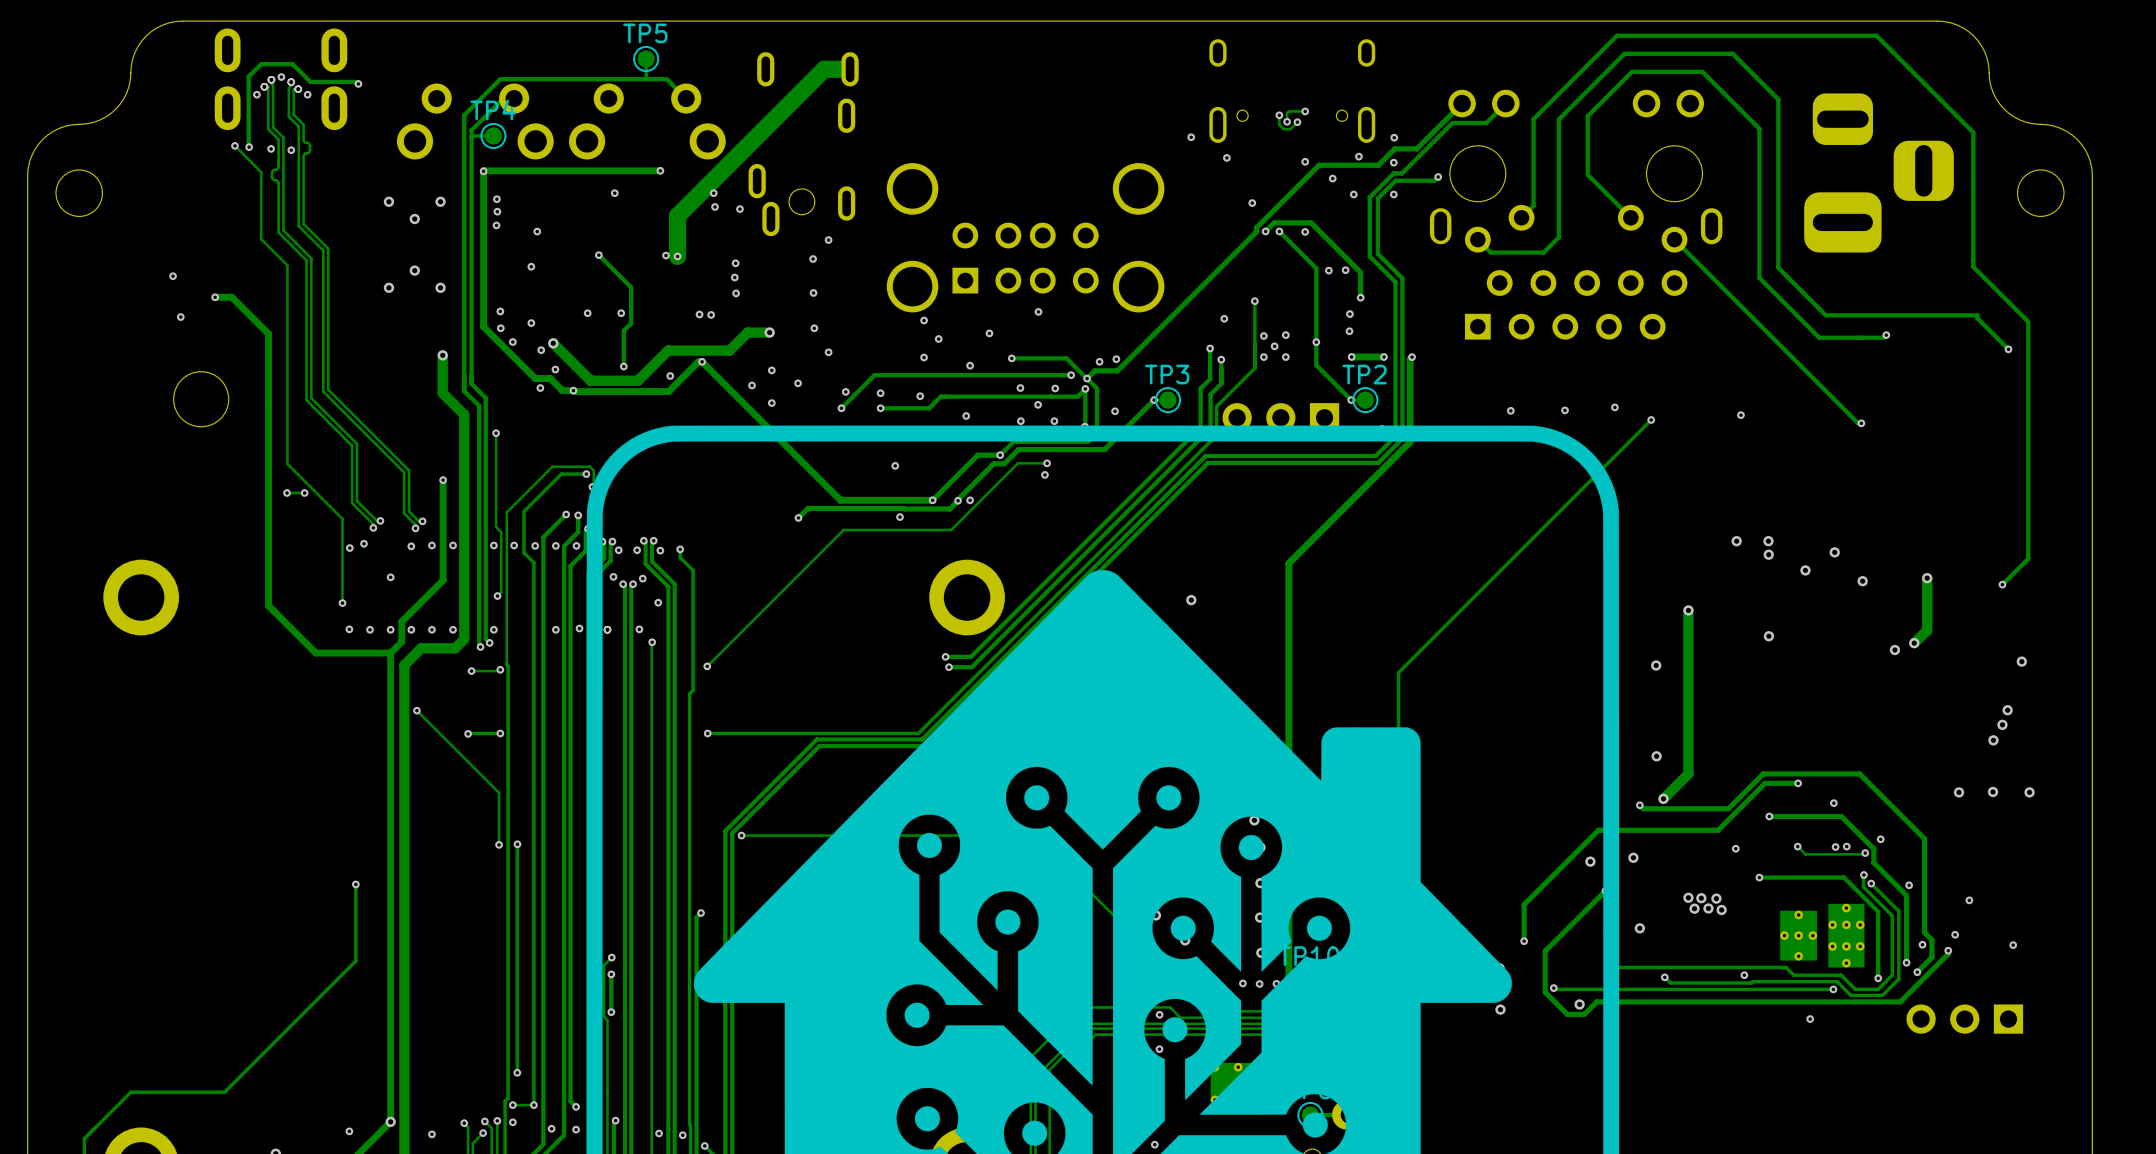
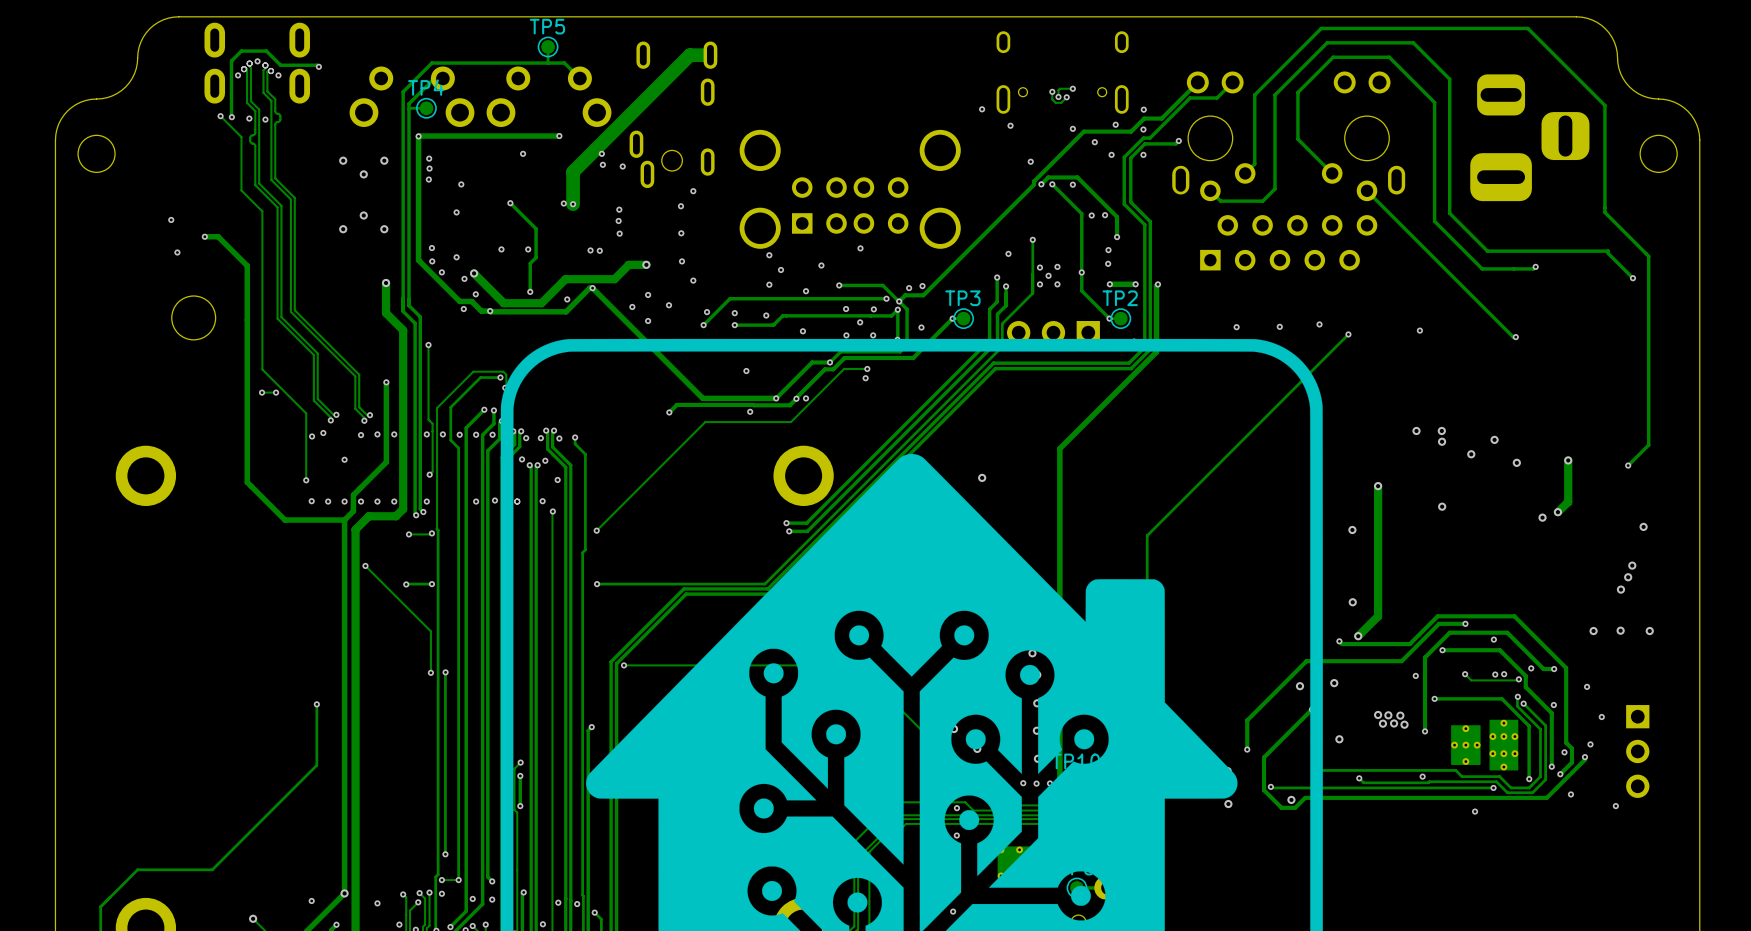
track: none -> (1554, 669) (1543, 669) (1507, 632) (1449, 632) (1425, 657) (1425, 731)
via: none -> (1554, 669)
via: none -> (1587, 686)
via: none -> (1425, 731)
via: (2013, 945) -> none
via: none -> (1570, 794)
via: none -> (1615, 806)
part rotation: 0° (1964, 1019) -> 90° counterclockwise (1637, 751)
part position: (1964, 1019) -> (1637, 751)

